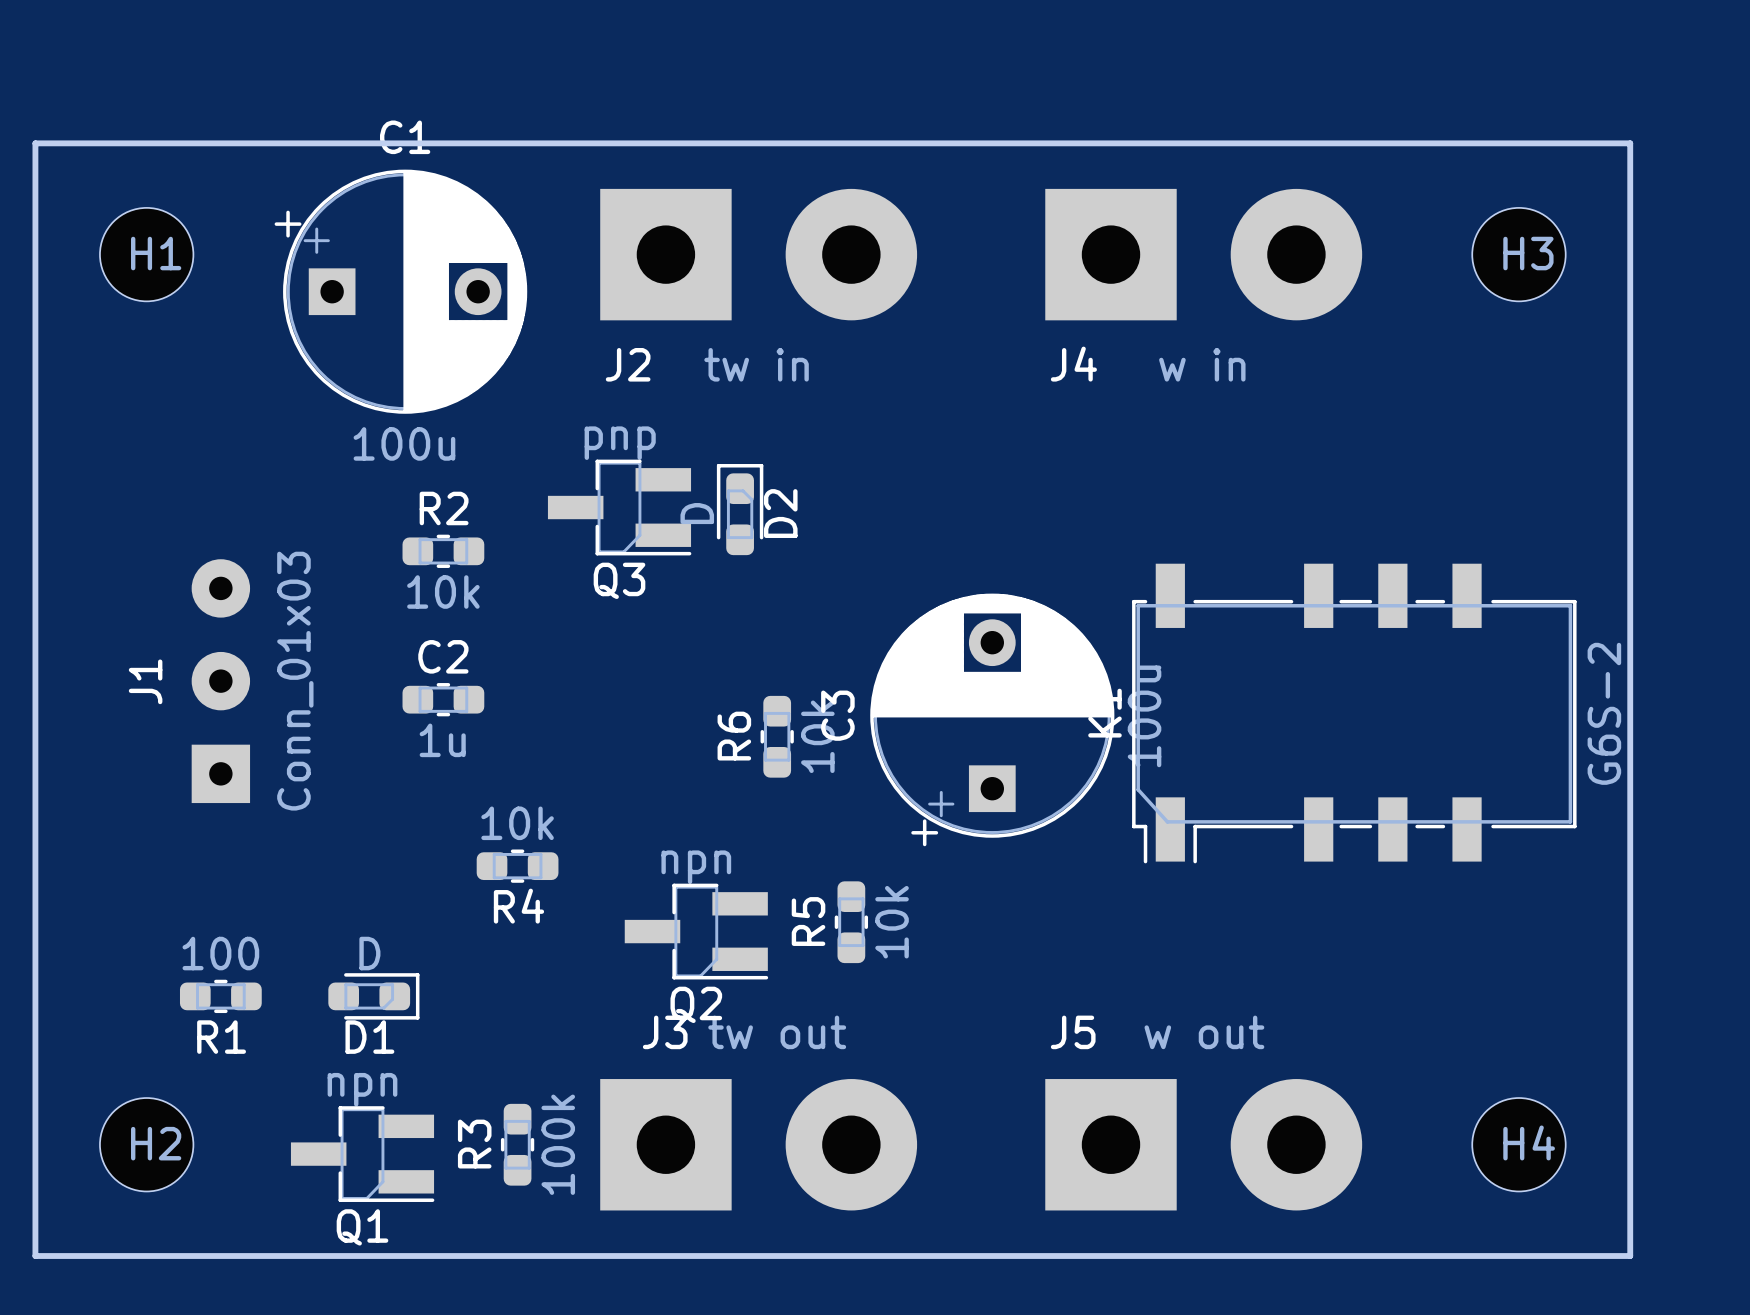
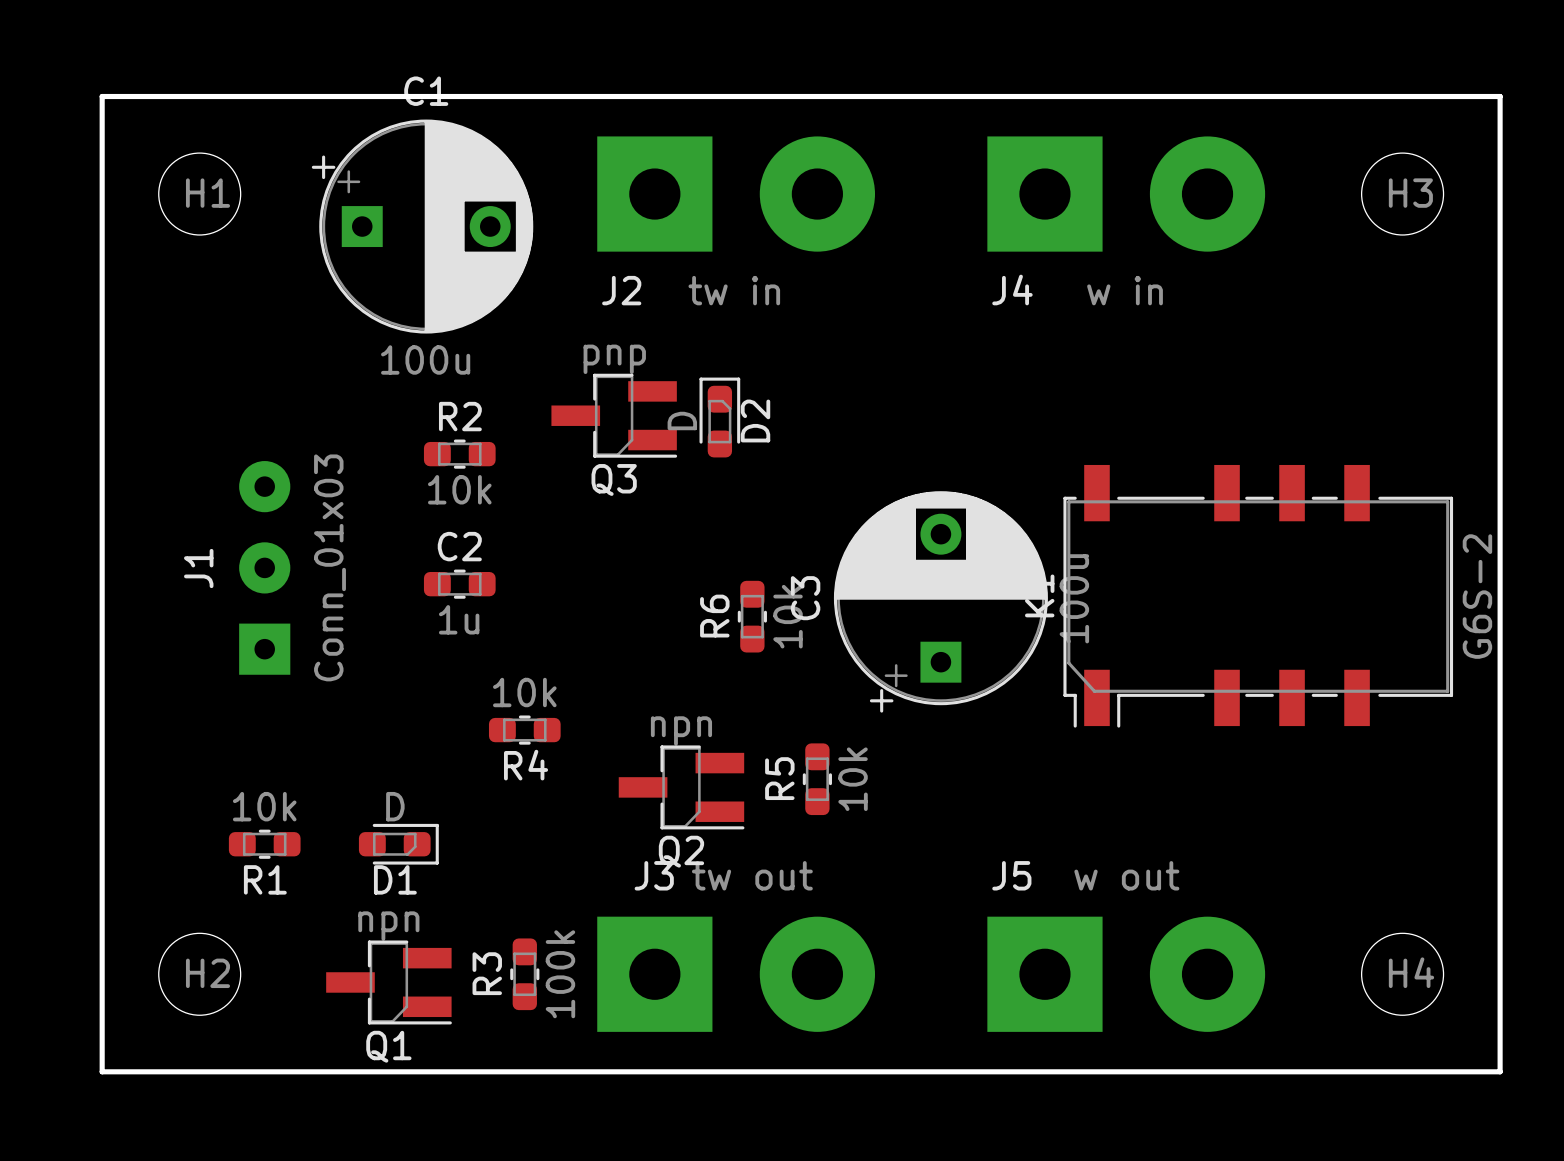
R1 value: 100 (220, 953) -> 10k (264, 806)

